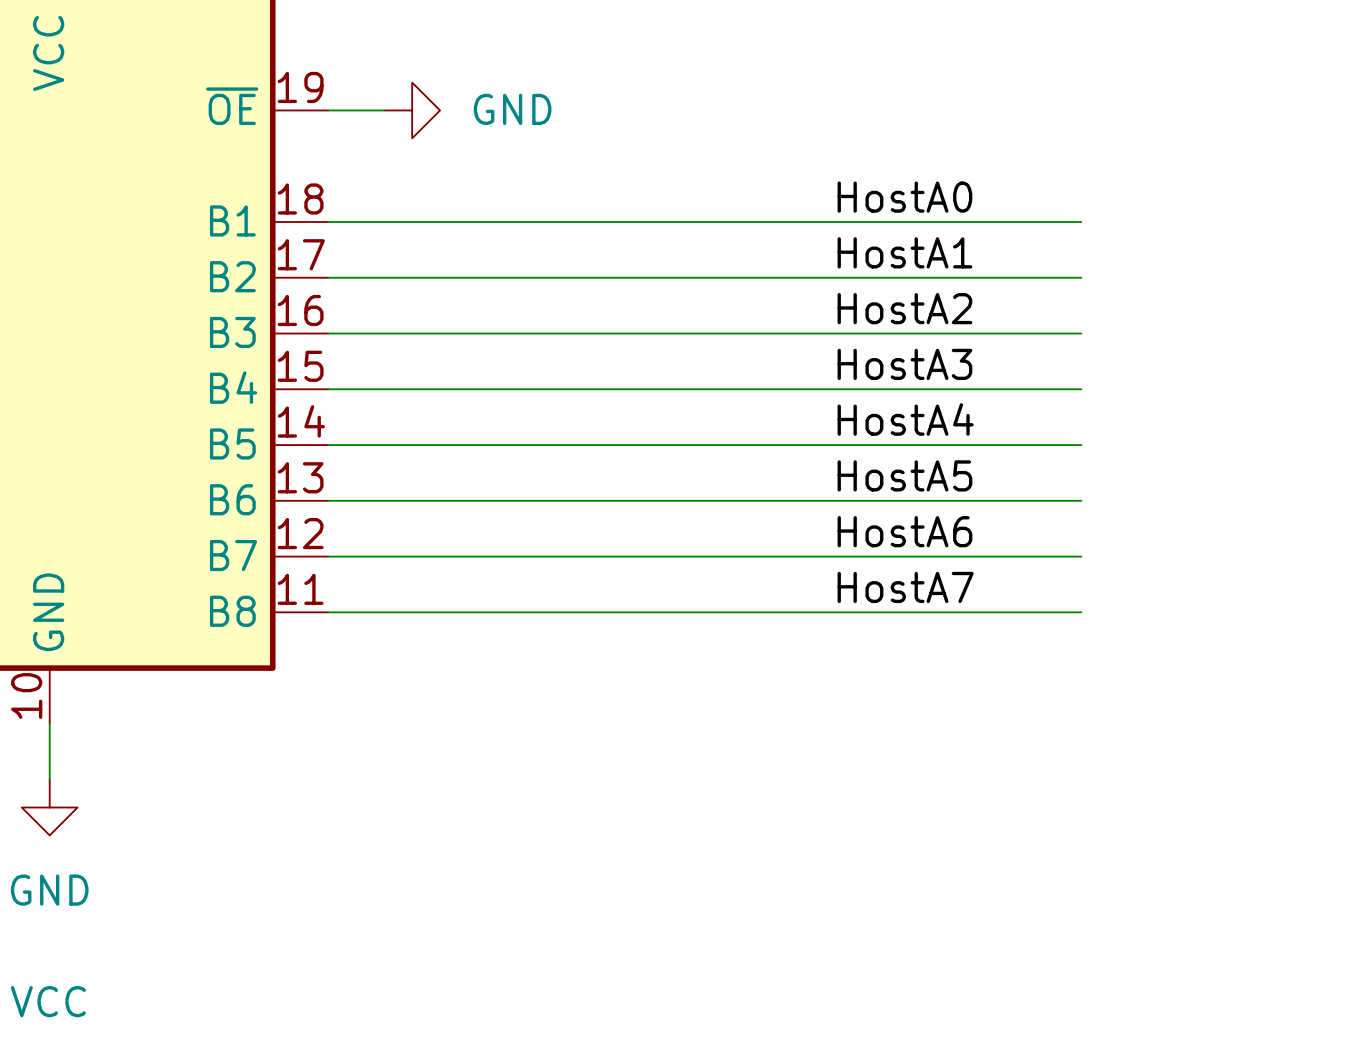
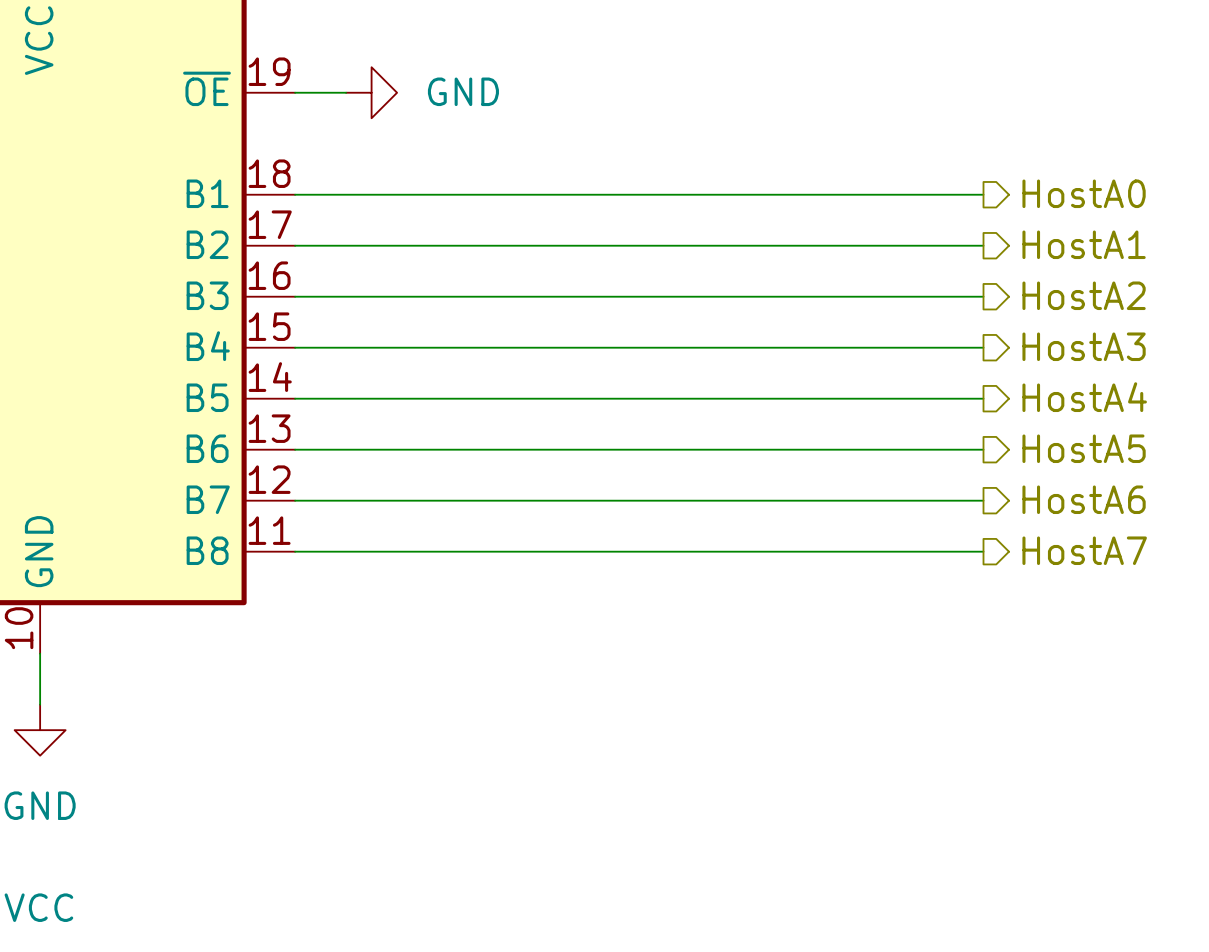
label: HostA0 (904, 197) -> none
hierarchical label: none -> HostA0 (1084, 193)
label: HostA1 (904, 252) -> none
hierarchical label: none -> HostA1 (1084, 244)
label: HostA2 (904, 308) -> none
hierarchical label: none -> HostA2 (1084, 295)
label: HostA3 (904, 364) -> none
hierarchical label: none -> HostA3 (1084, 346)
label: HostA4 (905, 419) -> none
hierarchical label: none -> HostA4 (1084, 397)
label: HostA5 (904, 475) -> none
hierarchical label: none -> HostA5 (1084, 448)
label: HostA6 (904, 531) -> none
hierarchical label: none -> HostA6 (1084, 499)
label: HostA7 (905, 587) -> none
hierarchical label: none -> HostA7 (1084, 550)

